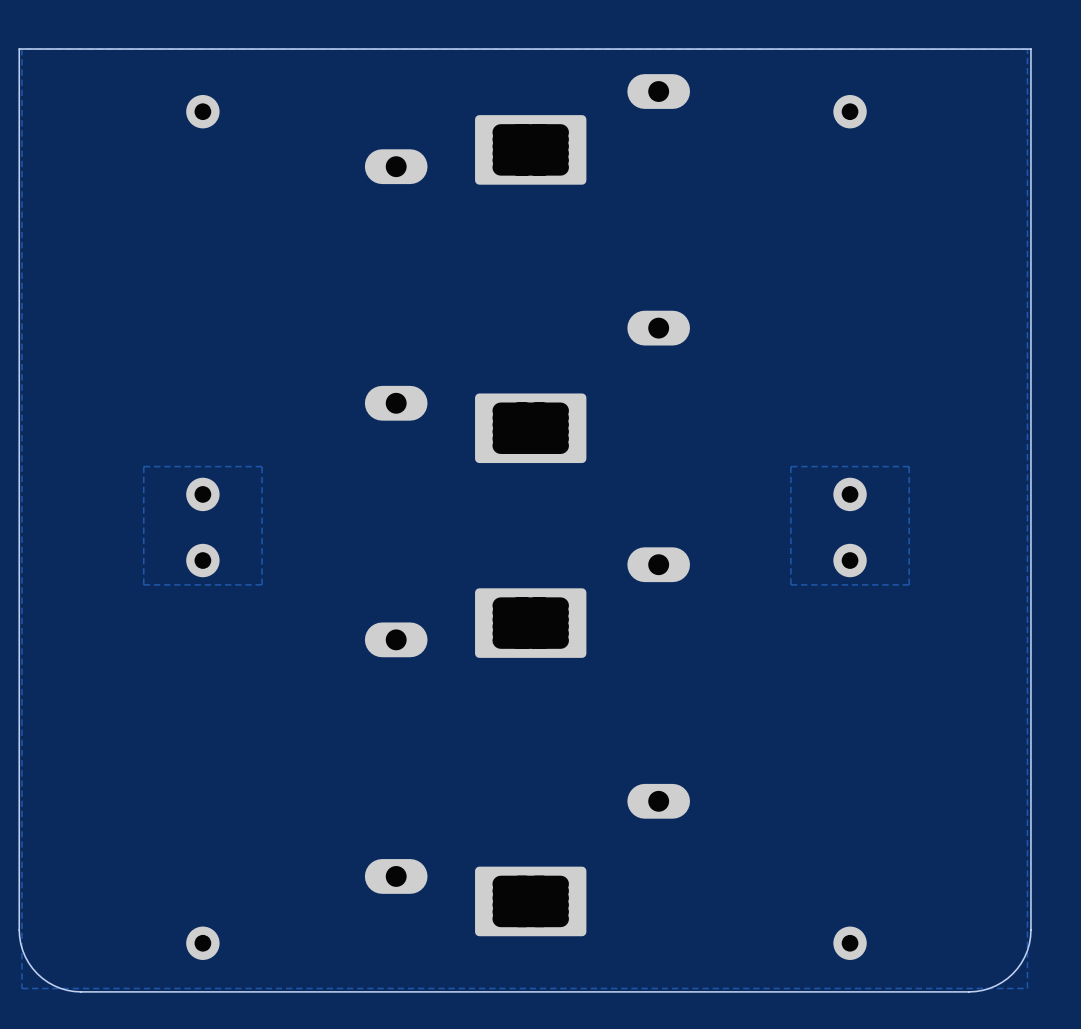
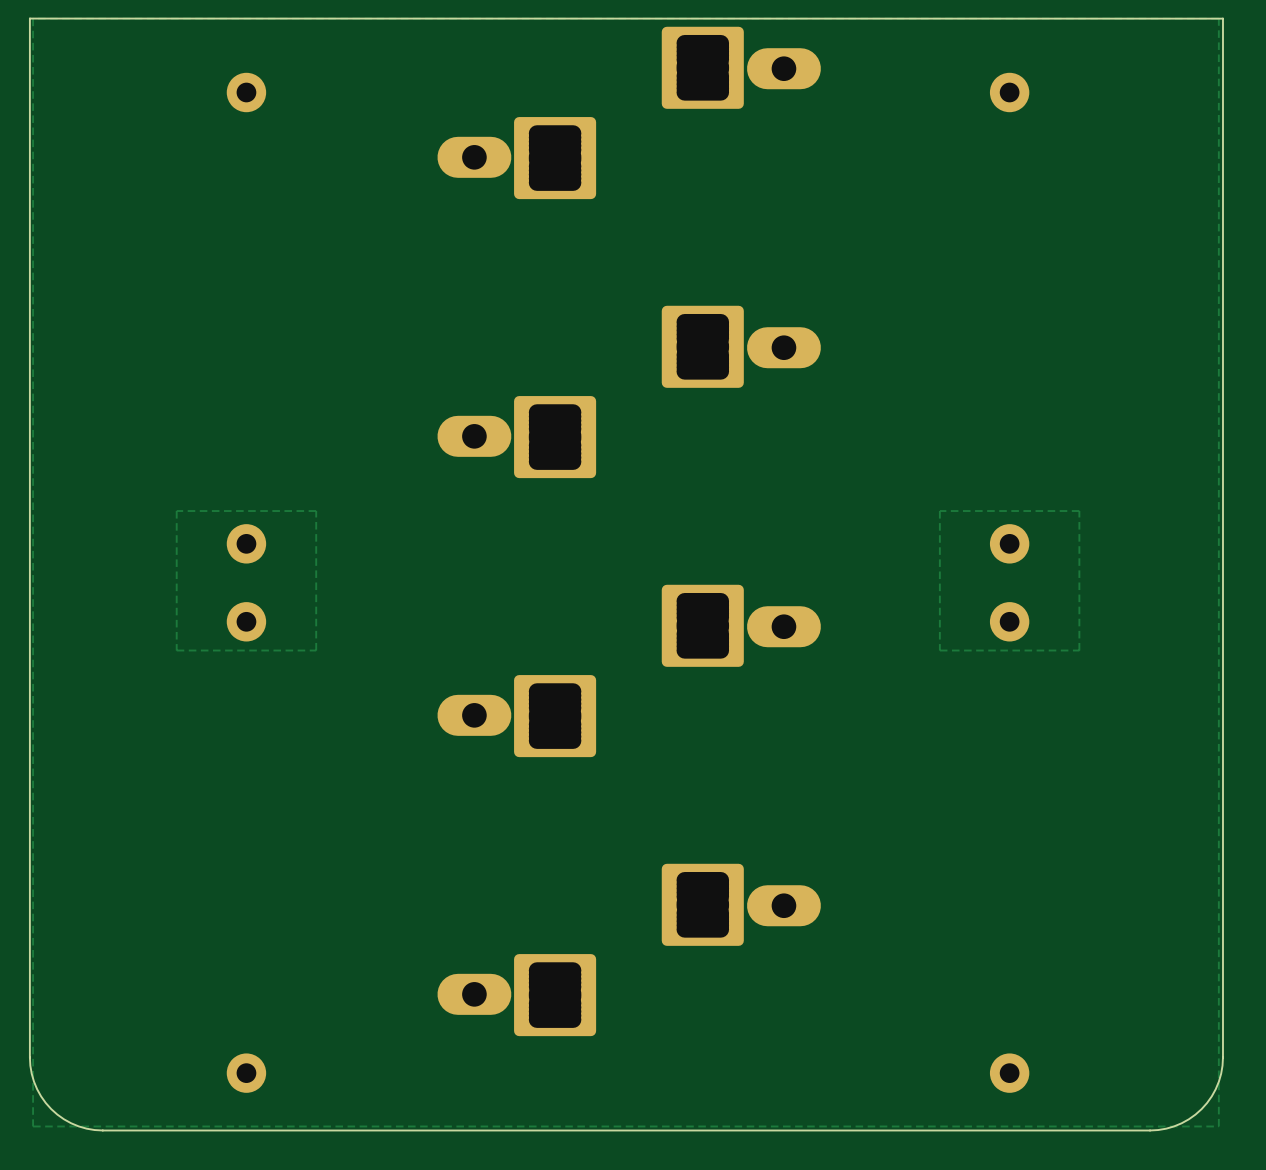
part: none -> (702, 67)
part: (530, 149) -> none
part: none -> (555, 158)
part: none -> (702, 346)
part: none -> (555, 437)
part: (530, 428) -> none
part: none -> (702, 625)
part: (530, 623) -> none
part: none -> (555, 716)
part: none -> (702, 904)
part: none -> (555, 995)
part: (530, 901) -> none

